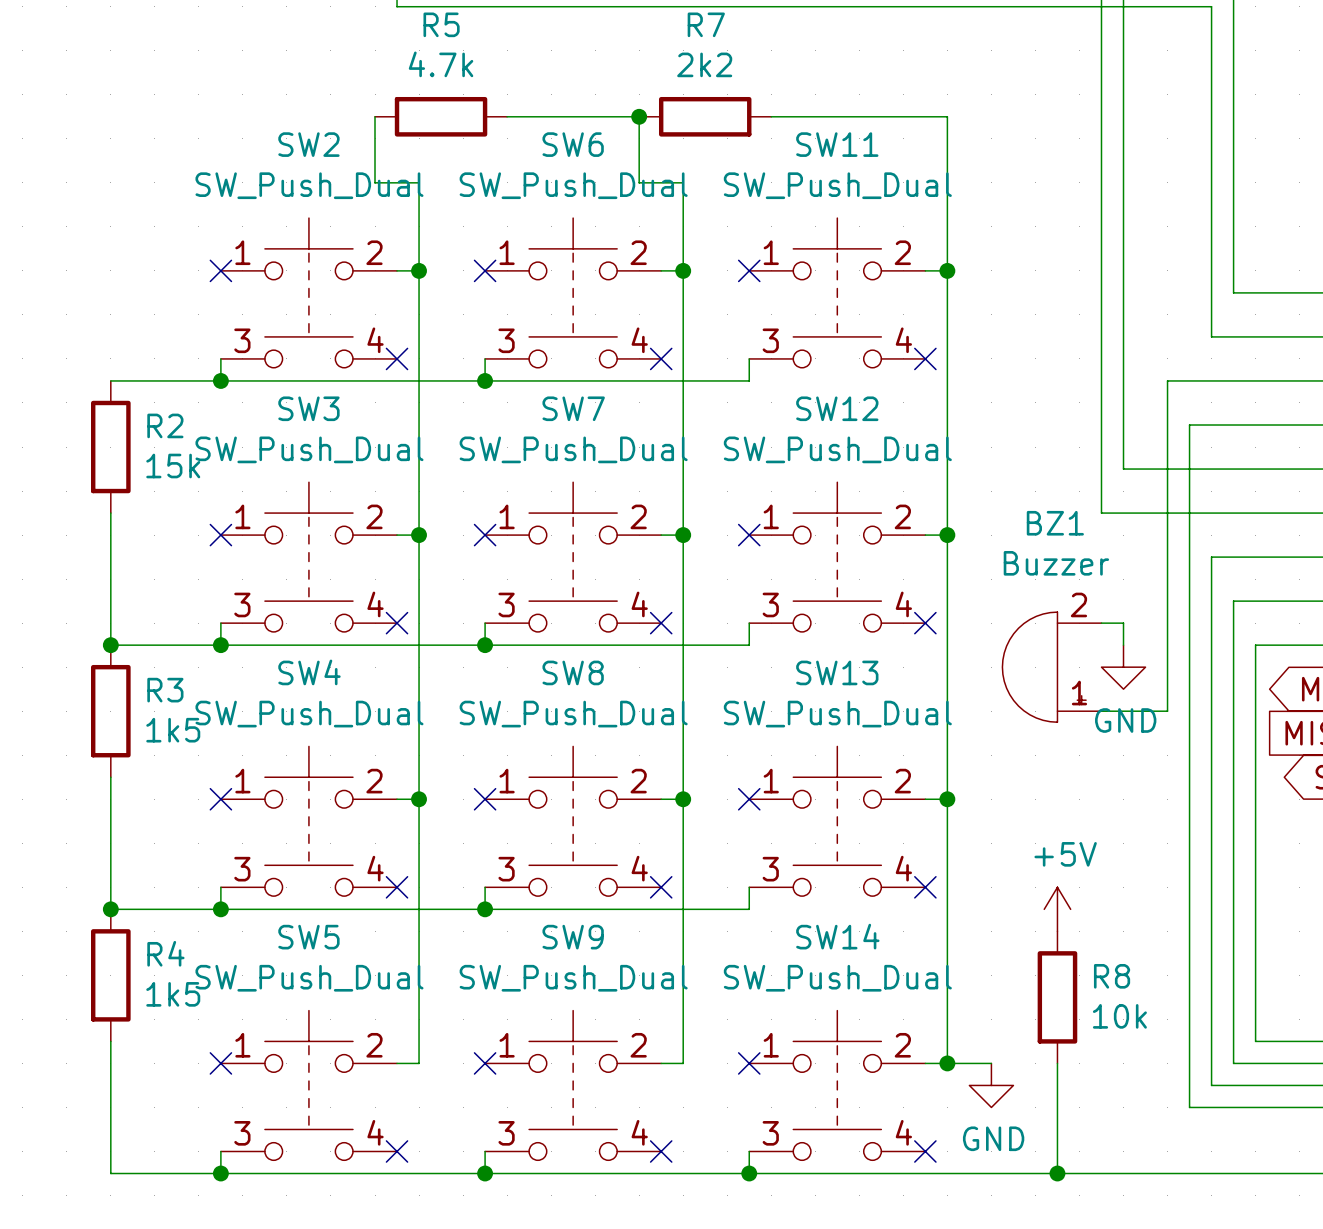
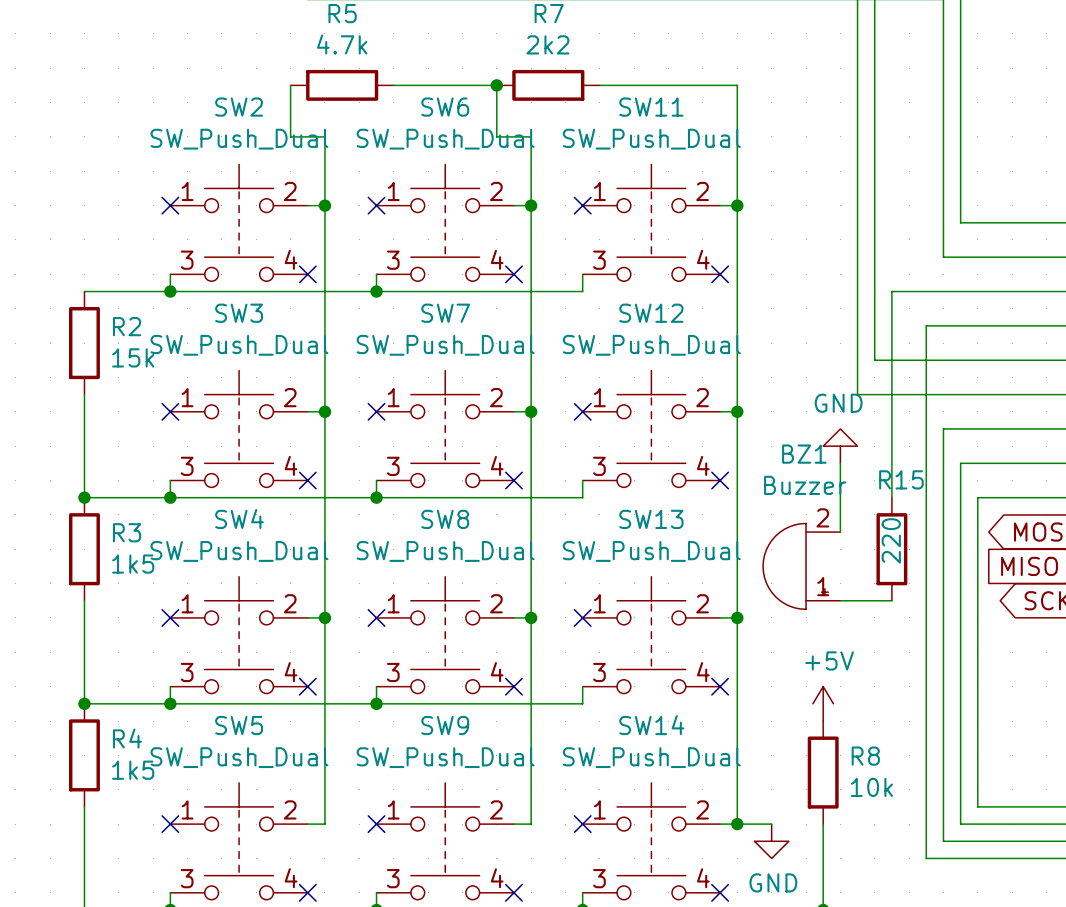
wire: (1167, 380) (1167, 711) (1101, 711) -> (909, 291) (891, 291) (891, 497)
wire: none -> (840, 463) (840, 532)
wire: (1101, 623) (1123, 623) (1123, 645) -> none
BZ1 position: (1051, 667) -> (801, 566)
power symbol rotation: 0° (1123, 667) -> 180° (840, 446)
power symbol position: GND (1123, 667) -> GND (840, 446)
R15: none -> 220 (891, 549)
wire: none -> (840, 600) (891, 600)

